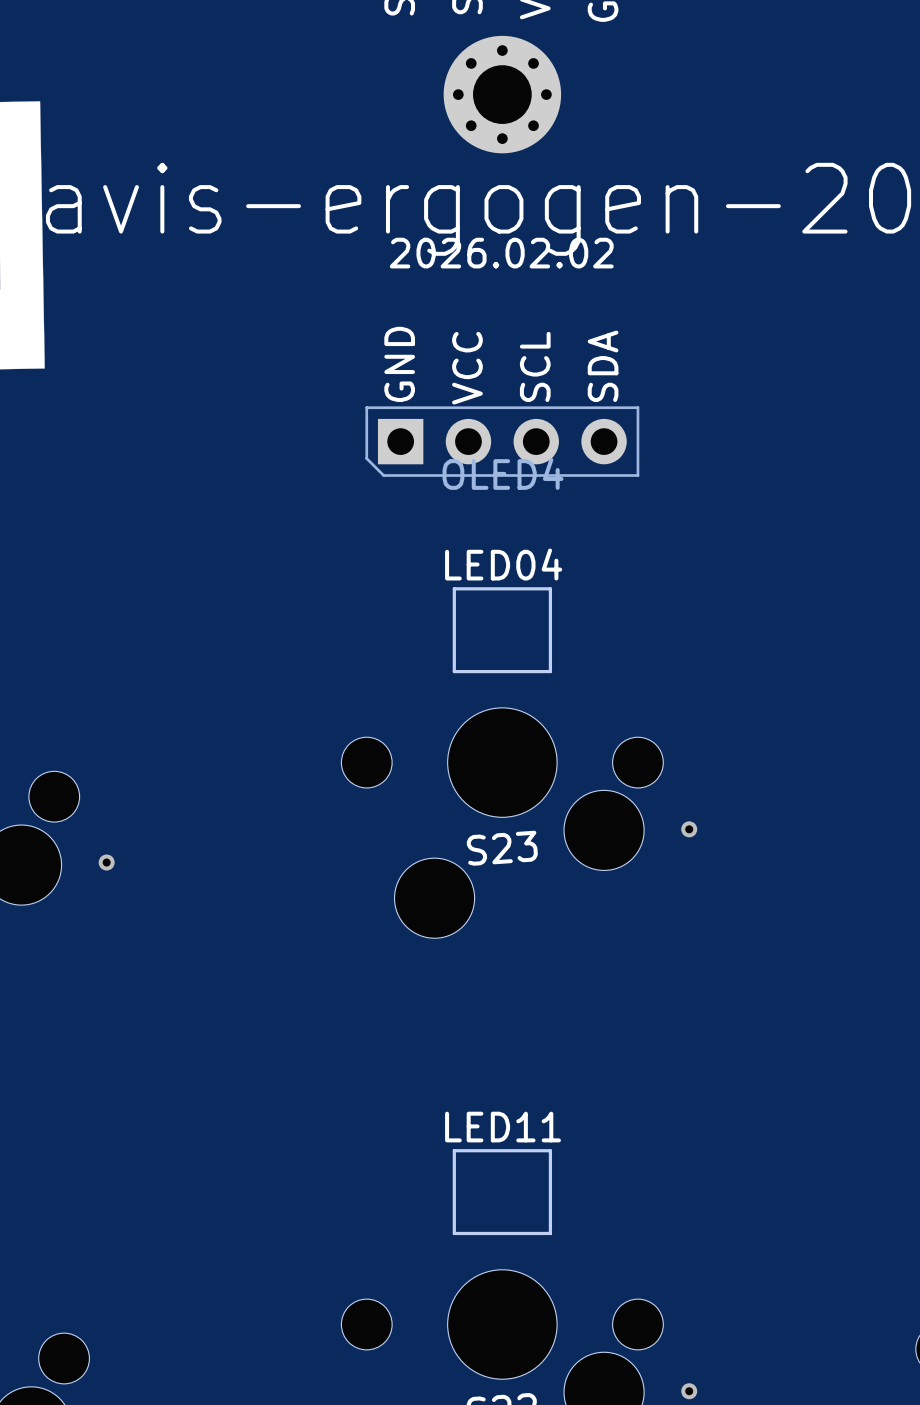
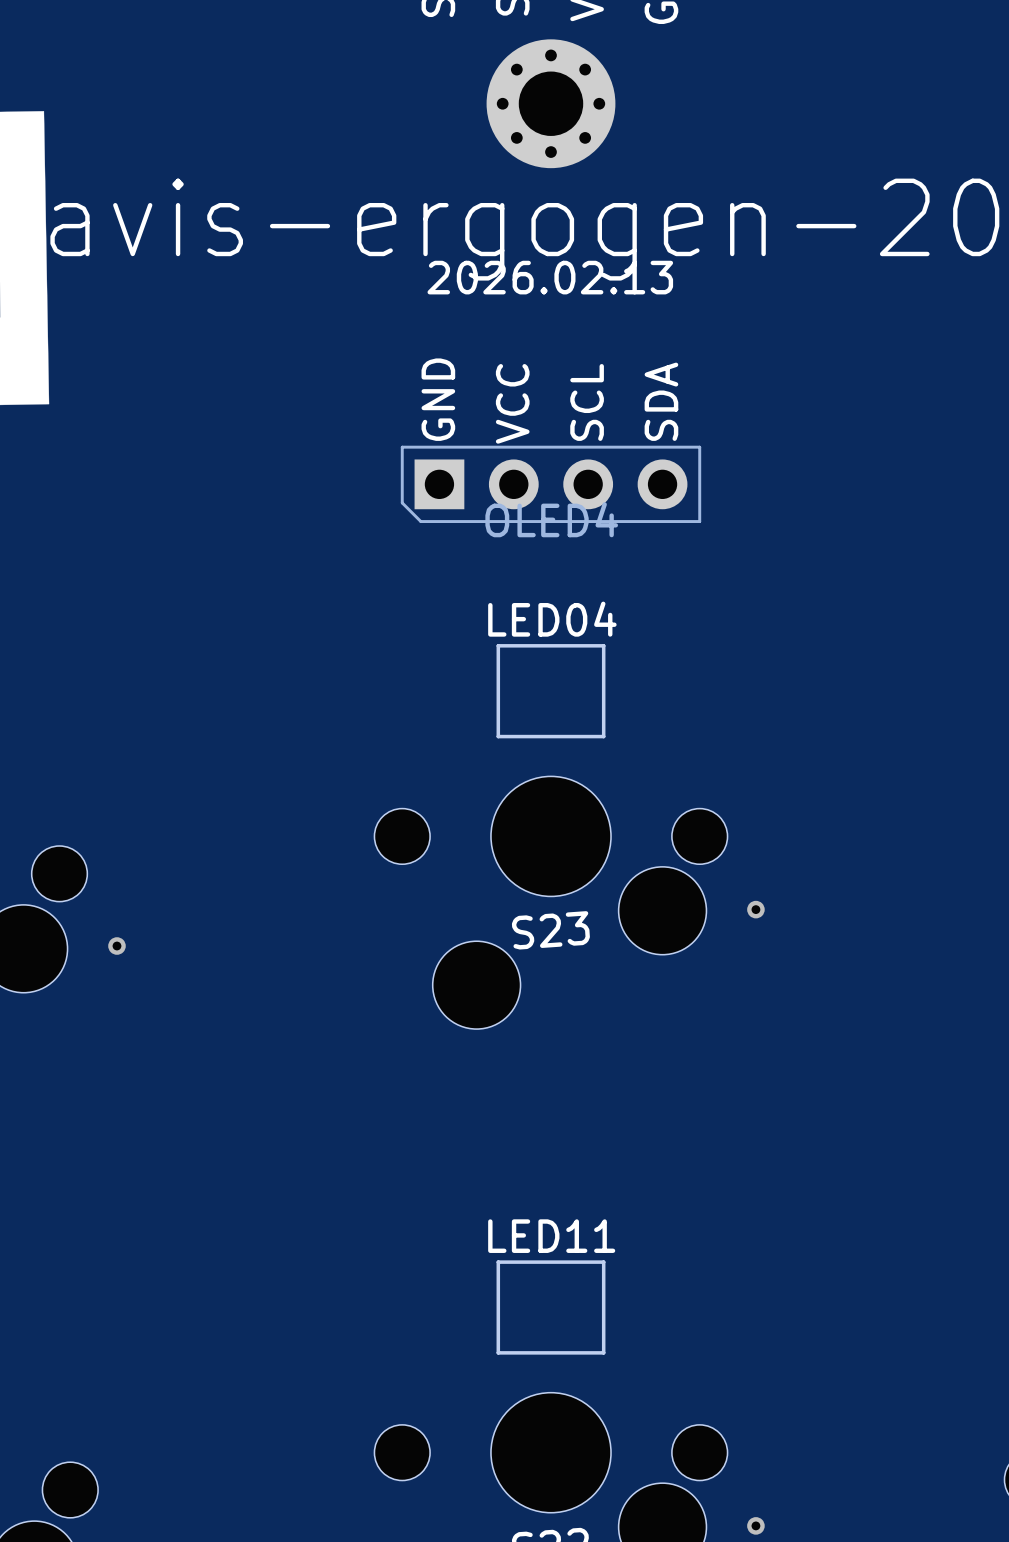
text: 2026.02.02 (501, 253) -> 2026.02.13 (550, 277)

